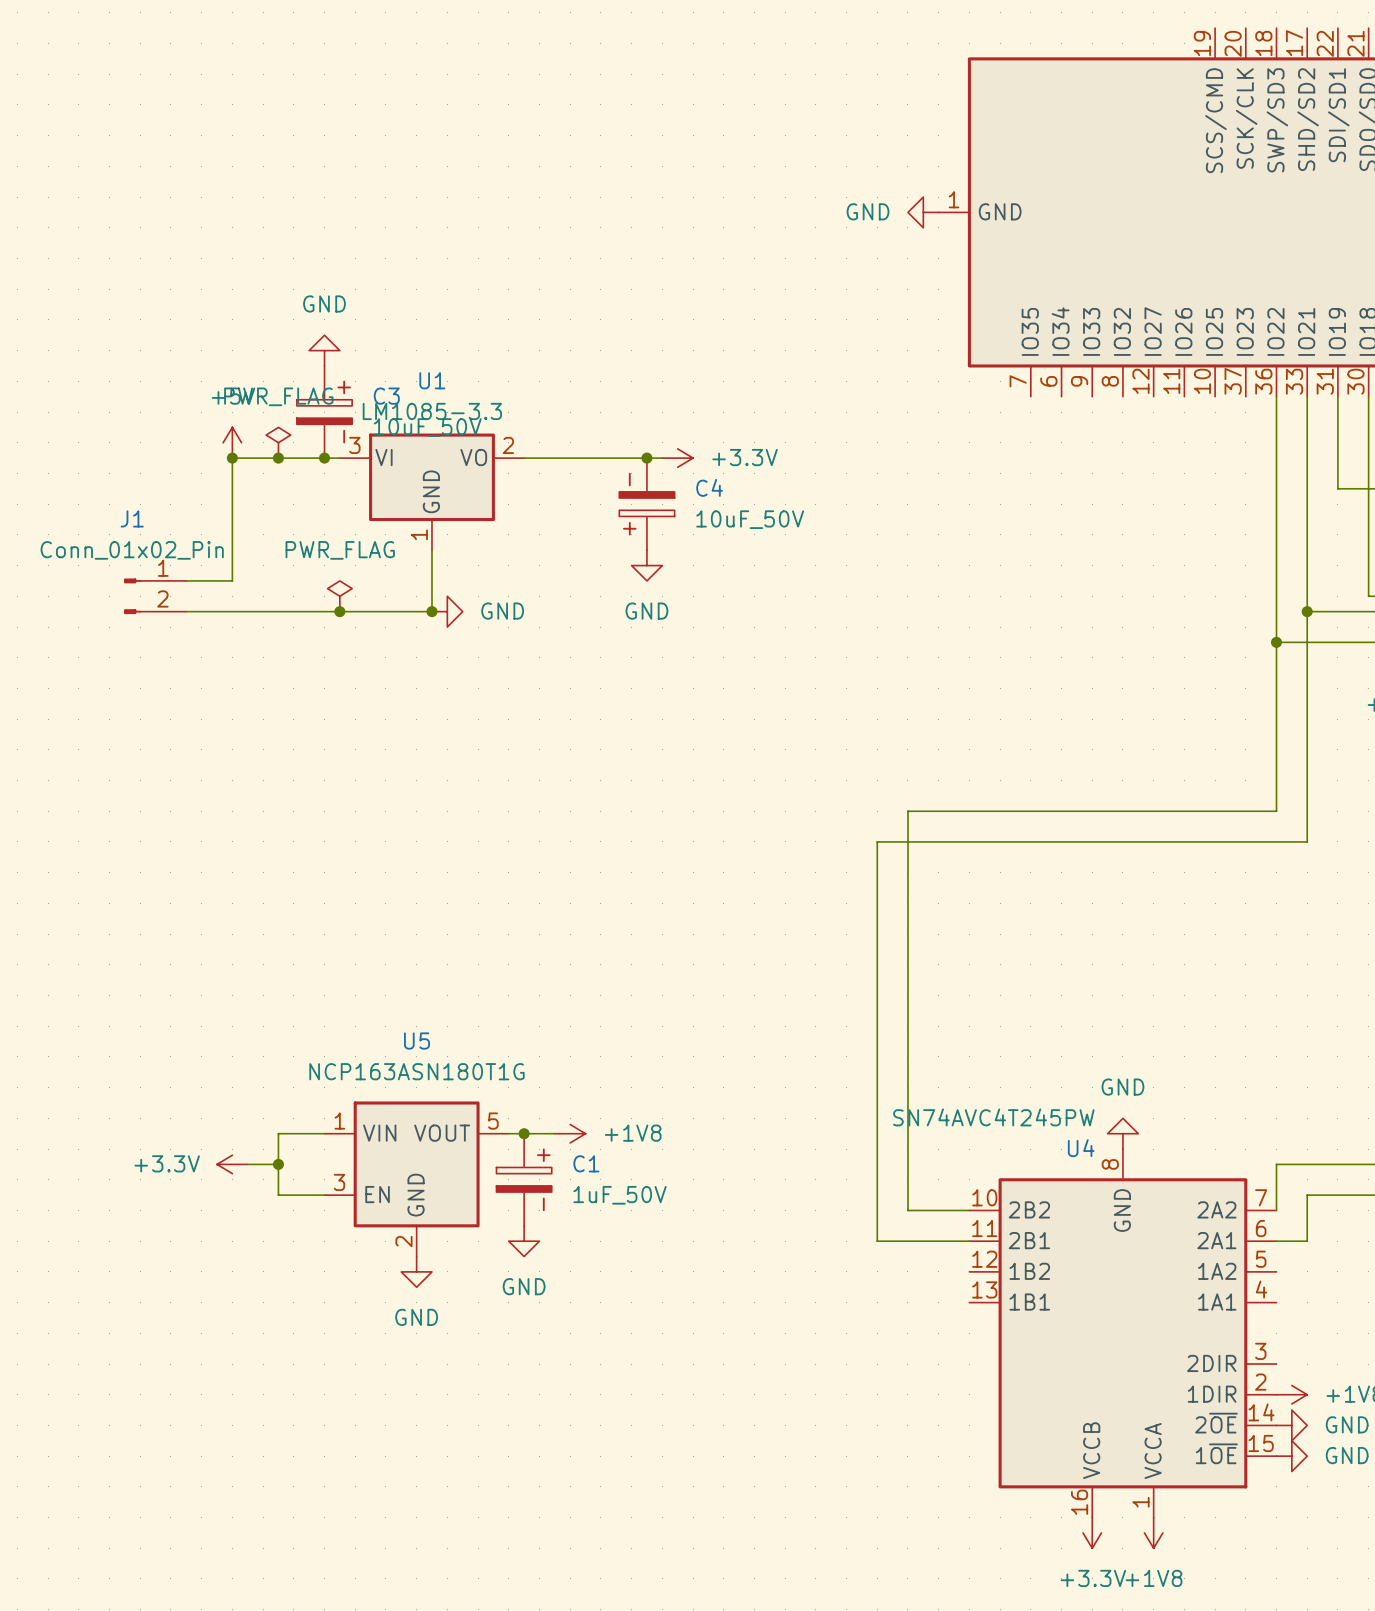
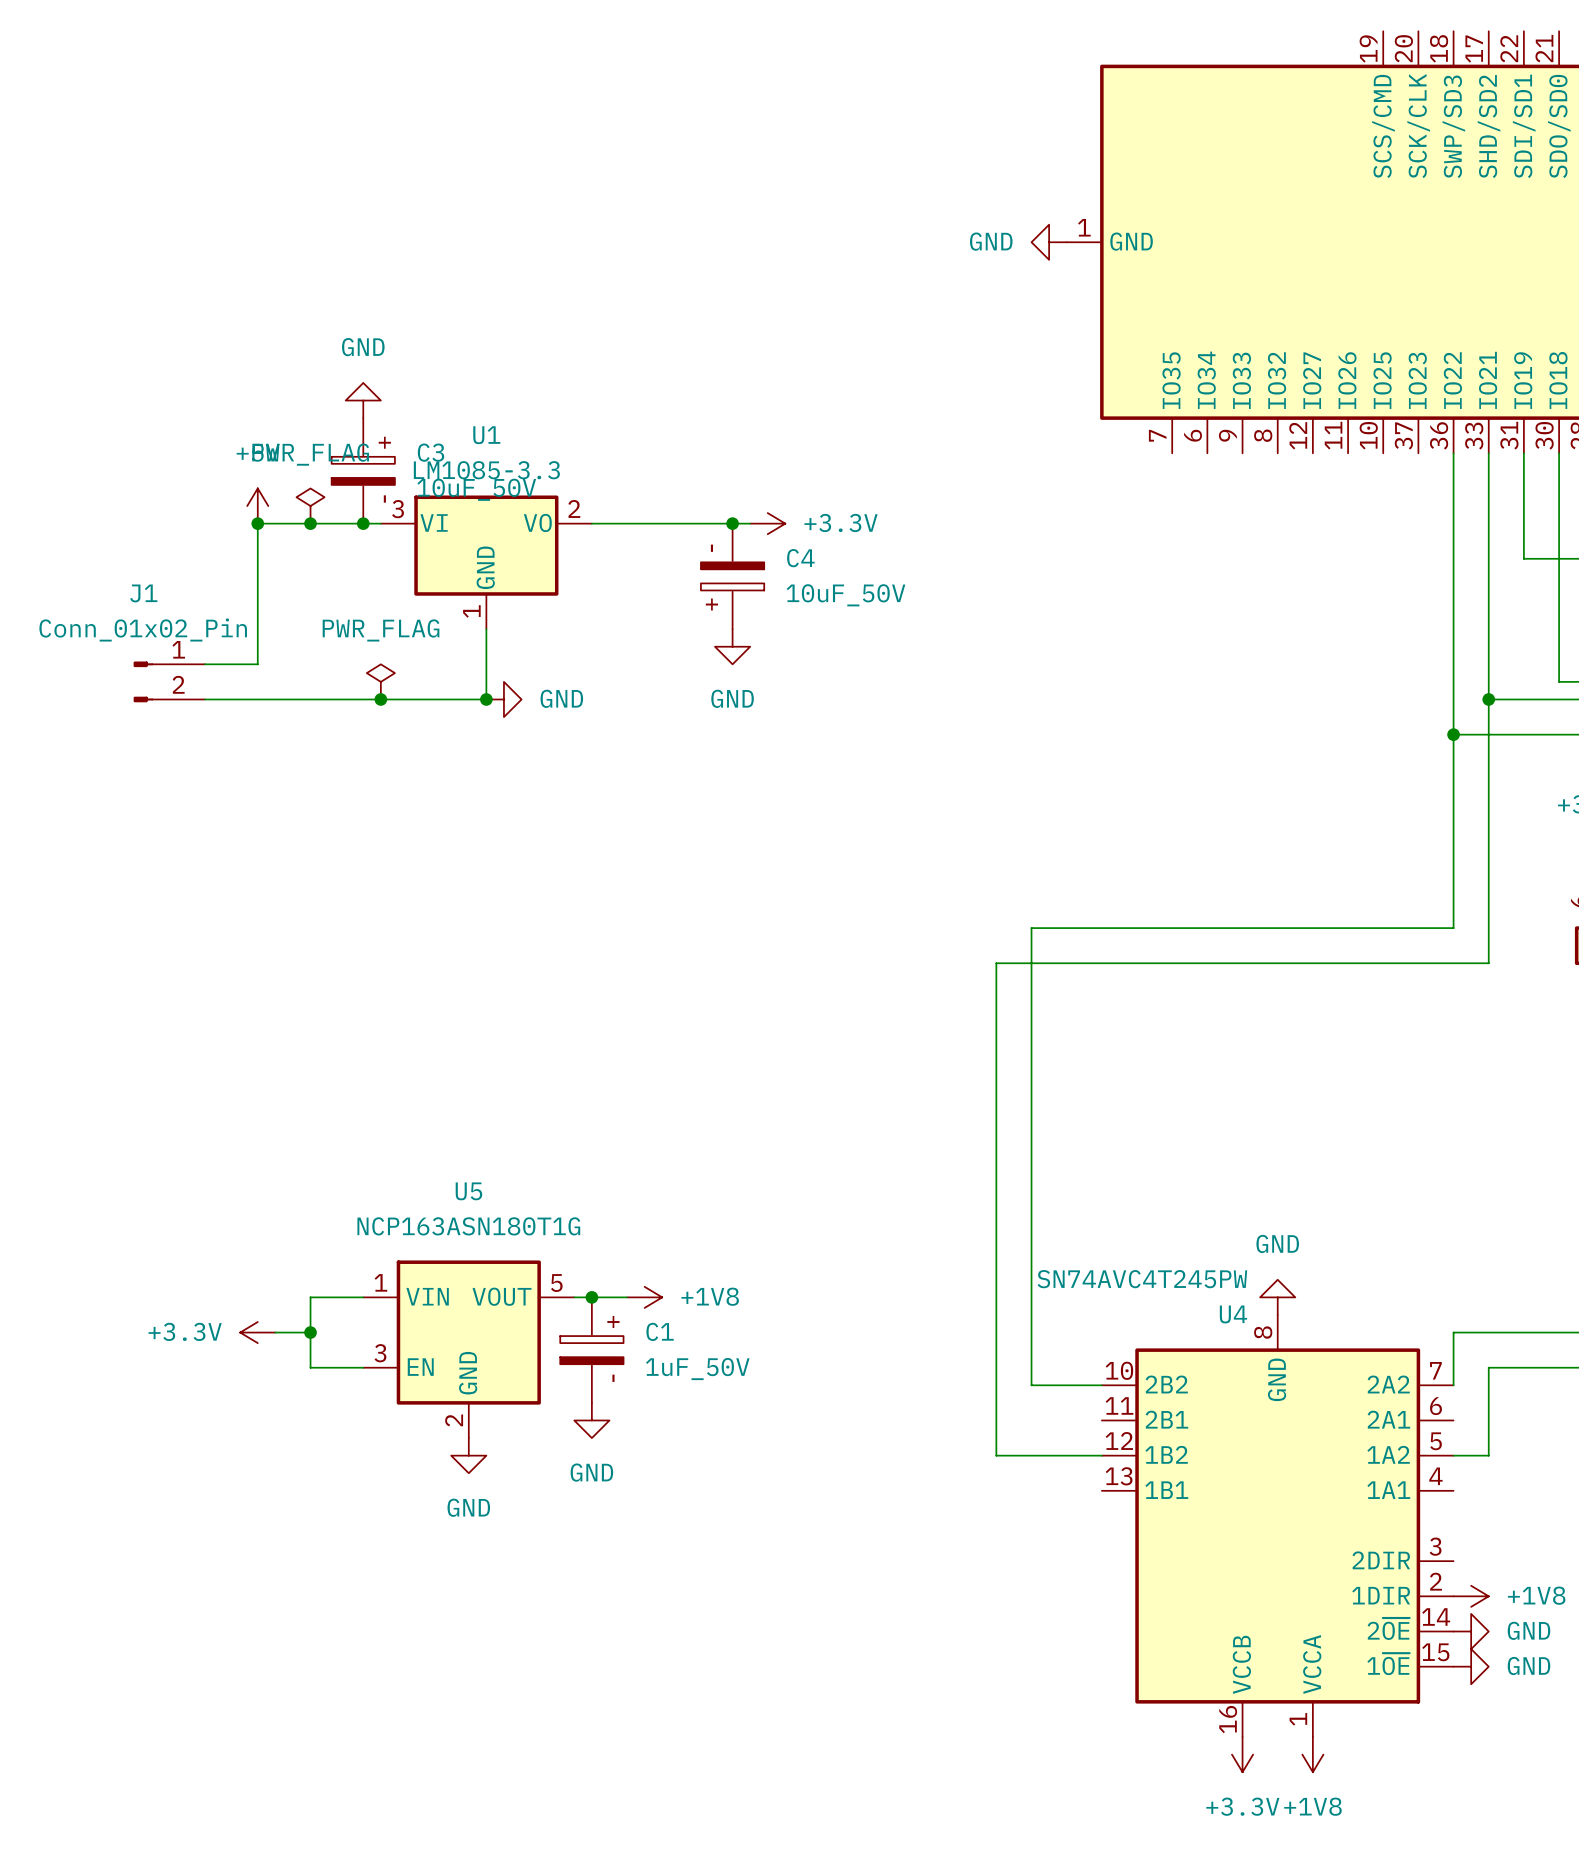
wire: (877, 1241) (969, 1241) -> (996, 1420) (996, 1455) (1101, 1455)
wire: (1276, 1241) (1307, 1241) -> (1453, 1455) (1488, 1455) (1488, 1420)

